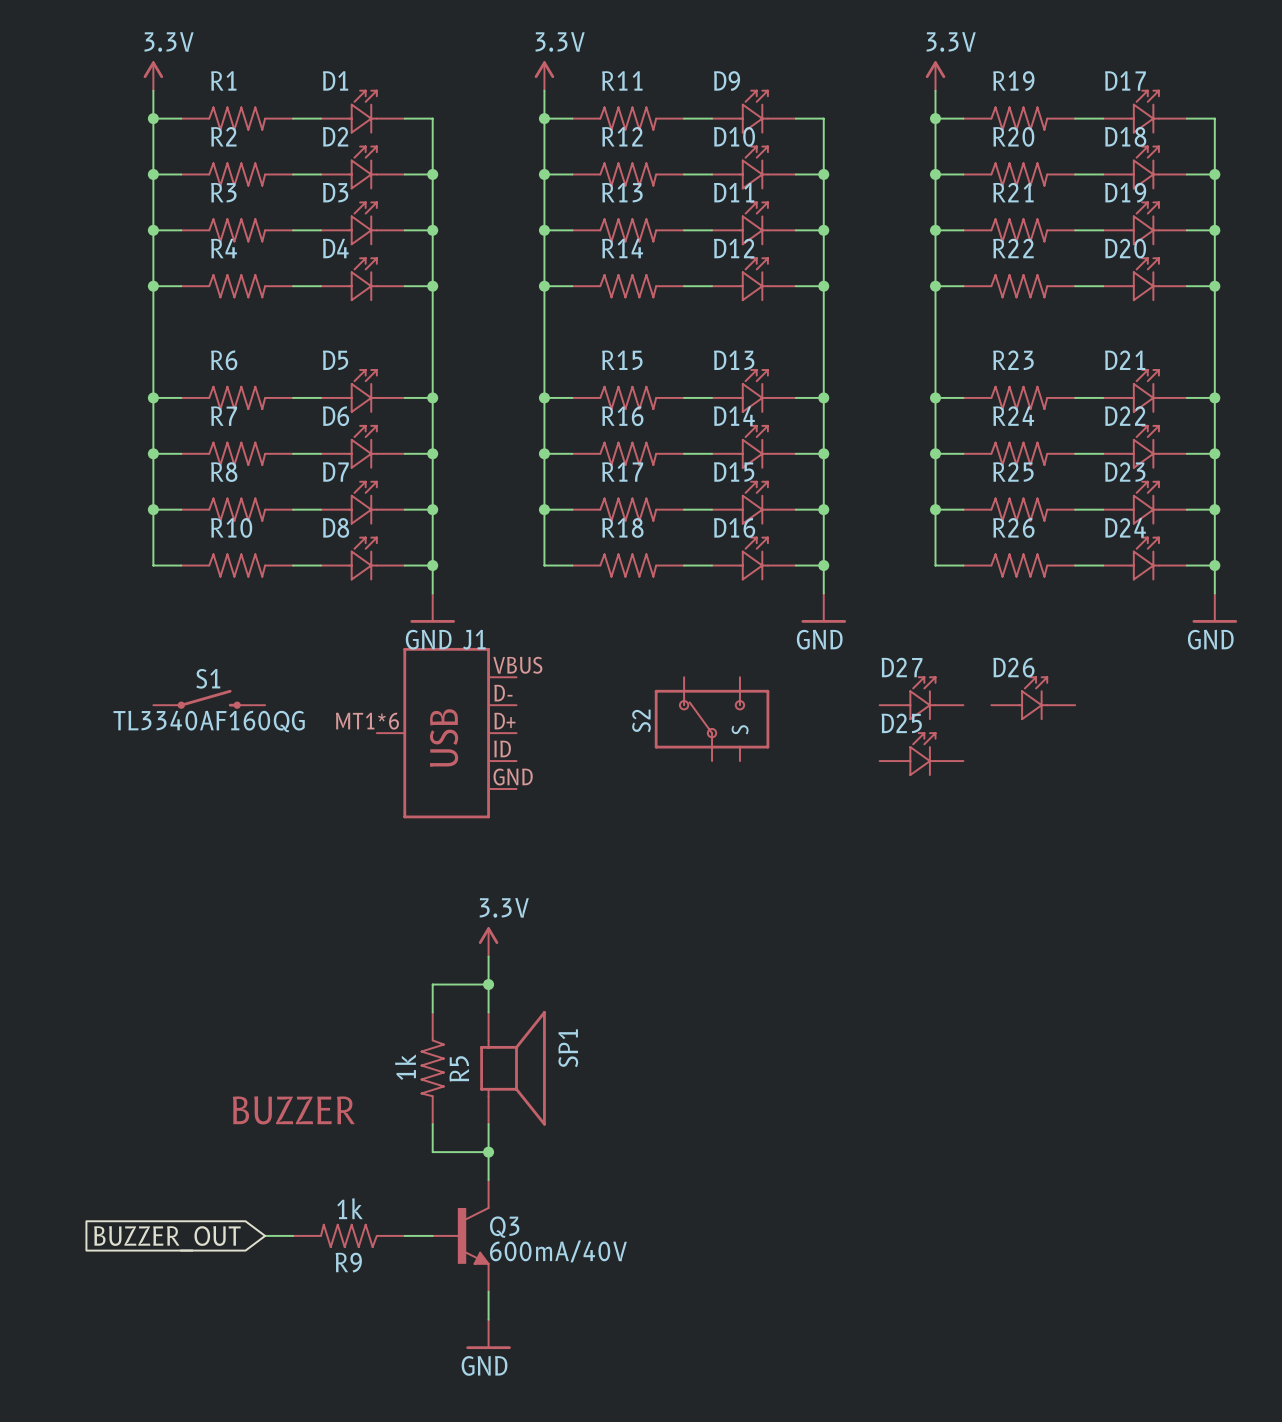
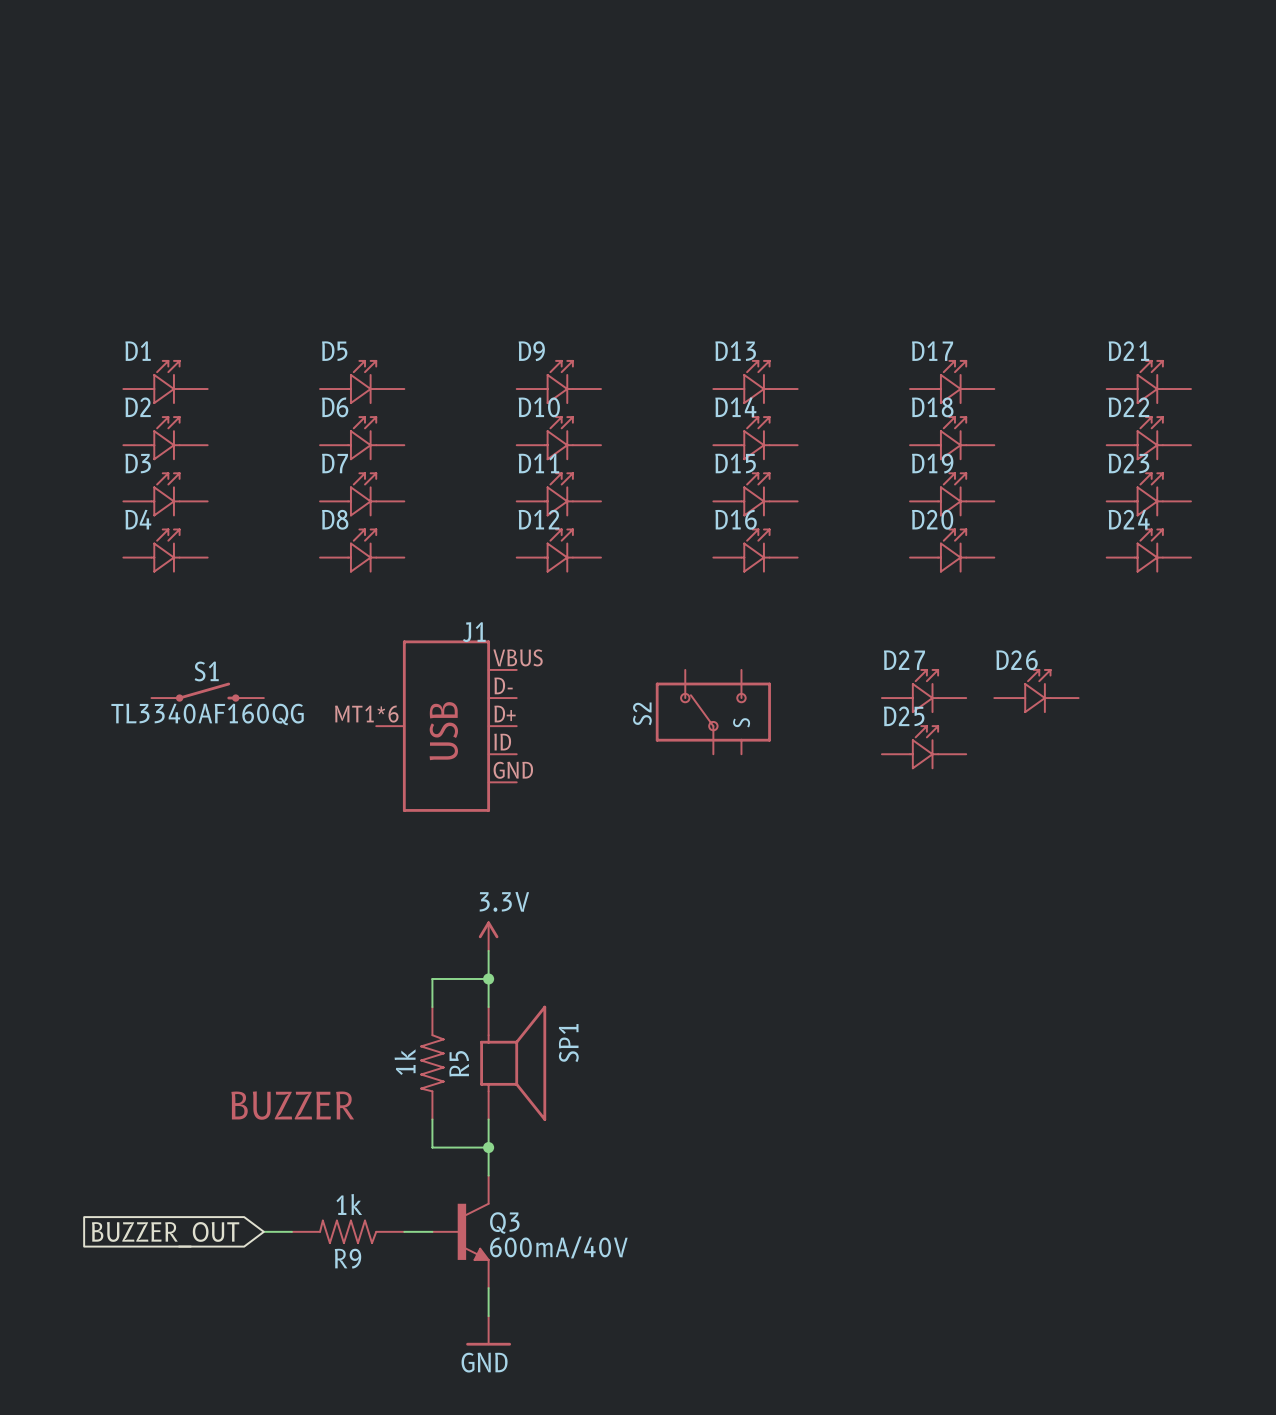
power symbol: 3.3V (153, 76) -> none
power symbol: 3.3V (544, 76) -> none
power symbol: 3.3V (935, 76) -> none
wire: (153, 90) (153, 565) (181, 565) -> none
wire: (544, 90) (544, 565) (572, 565) -> none
wire: (935, 90) (935, 565) (963, 565) -> none
D1 position: (362, 111) -> (165, 381)
D9 position: (753, 111) -> (558, 381)
D17 position: (1144, 111) -> (952, 381)
wire: (153, 118) (181, 118) -> none
junction: (153, 118) -> none
R1: (237, 118) -> none
wire: (293, 118) (320, 118) -> none
wire: (404, 118) (432, 118) (432, 593) -> none
wire: (544, 118) (572, 118) -> none
junction: (544, 118) -> none
R11: (628, 118) -> none
wire: (684, 118) (712, 118) -> none
wire: (795, 118) (823, 118) (823, 593) -> none
wire: (935, 118) (963, 118) -> none
junction: (935, 118) -> none
R19: (1019, 118) -> none
wire: (1075, 118) (1103, 118) -> none
wire: (1186, 118) (1214, 118) (1214, 593) -> none
D2 position: (362, 167) -> (165, 438)
D10 position: (753, 167) -> (558, 438)
D18 position: (1144, 167) -> (952, 438)
wire: (153, 174) (181, 174) -> none
junction: (153, 174) -> none
R2: (237, 174) -> none
wire: (293, 174) (320, 174) -> none
wire: (404, 174) (432, 174) -> none
junction: (432, 174) -> none
wire: (544, 174) (572, 174) -> none
junction: (544, 174) -> none
R12: (628, 174) -> none
wire: (684, 174) (712, 174) -> none
wire: (795, 174) (823, 174) -> none
junction: (823, 174) -> none
wire: (935, 174) (963, 174) -> none
junction: (935, 174) -> none
R20: (1019, 174) -> none
wire: (1075, 174) (1103, 174) -> none
wire: (1186, 174) (1214, 174) -> none
junction: (1214, 174) -> none
D3 position: (362, 223) -> (165, 494)
D11 position: (753, 223) -> (558, 494)
D19 position: (1144, 223) -> (952, 494)
wire: (153, 230) (181, 230) -> none
junction: (153, 230) -> none
R3: (237, 230) -> none
wire: (293, 230) (320, 230) -> none
wire: (404, 230) (432, 230) -> none
junction: (432, 230) -> none
wire: (544, 230) (572, 230) -> none
junction: (544, 230) -> none
R13: (628, 230) -> none
wire: (684, 230) (712, 230) -> none
wire: (795, 230) (823, 230) -> none
junction: (823, 230) -> none
wire: (935, 230) (963, 230) -> none
junction: (935, 230) -> none
R21: (1019, 230) -> none
wire: (1075, 230) (1103, 230) -> none
wire: (1186, 230) (1214, 230) -> none
junction: (1214, 230) -> none
D4 position: (362, 279) -> (165, 550)
D12 position: (753, 279) -> (558, 550)
D20 position: (1144, 279) -> (952, 550)
wire: (153, 286) (181, 286) -> none
junction: (153, 286) -> none
R4: (237, 286) -> none
wire: (293, 286) (320, 286) -> none
wire: (404, 286) (432, 286) -> none
junction: (432, 286) -> none
wire: (544, 286) (572, 286) -> none
junction: (544, 286) -> none
R14: (628, 286) -> none
wire: (684, 286) (712, 286) -> none
wire: (795, 286) (823, 286) -> none
junction: (823, 286) -> none
wire: (935, 286) (963, 286) -> none
junction: (935, 286) -> none
R22: (1019, 286) -> none
wire: (1075, 286) (1103, 286) -> none
wire: (1186, 286) (1214, 286) -> none
junction: (1214, 286) -> none
wire: (153, 397) (181, 397) -> none
junction: (153, 397) -> none
R6: (237, 397) -> none
wire: (293, 397) (320, 397) -> none
wire: (404, 397) (432, 397) -> none
junction: (432, 397) -> none
wire: (544, 397) (572, 397) -> none
junction: (544, 397) -> none
R15: (628, 397) -> none
wire: (684, 397) (712, 397) -> none
wire: (795, 397) (823, 397) -> none
junction: (823, 397) -> none
wire: (935, 397) (963, 397) -> none
junction: (935, 397) -> none
R23: (1019, 397) -> none
wire: (1075, 397) (1103, 397) -> none
wire: (1186, 397) (1214, 397) -> none
junction: (1214, 397) -> none
wire: (153, 453) (181, 453) -> none
junction: (153, 453) -> none
R7: (237, 453) -> none
wire: (293, 453) (320, 453) -> none
wire: (404, 453) (432, 453) -> none
junction: (432, 453) -> none
wire: (544, 453) (572, 453) -> none
junction: (544, 453) -> none
R16: (628, 453) -> none
wire: (684, 453) (712, 453) -> none
wire: (795, 453) (823, 453) -> none
junction: (823, 453) -> none
wire: (935, 453) (963, 453) -> none
junction: (935, 453) -> none
R24: (1019, 453) -> none
wire: (1075, 453) (1103, 453) -> none
wire: (1186, 453) (1214, 453) -> none
junction: (1214, 453) -> none
wire: (153, 509) (181, 509) -> none
junction: (153, 509) -> none
R8: (237, 509) -> none
wire: (293, 509) (320, 509) -> none
wire: (404, 509) (432, 509) -> none
junction: (432, 509) -> none
wire: (544, 509) (572, 509) -> none
junction: (544, 509) -> none
R17: (628, 509) -> none
wire: (684, 509) (712, 509) -> none
wire: (795, 509) (823, 509) -> none
junction: (823, 509) -> none
wire: (935, 509) (963, 509) -> none
junction: (935, 509) -> none
R25: (1019, 509) -> none
wire: (1075, 509) (1103, 509) -> none
wire: (1186, 509) (1214, 509) -> none
junction: (1214, 509) -> none
R10: (237, 565) -> none
wire: (293, 565) (320, 565) -> none
wire: (404, 565) (432, 565) -> none
junction: (432, 565) -> none
R18: (628, 565) -> none
wire: (684, 565) (712, 565) -> none
wire: (795, 565) (823, 565) -> none
junction: (823, 565) -> none
R26: (1019, 565) -> none
wire: (1075, 565) (1103, 565) -> none
wire: (1186, 565) (1214, 565) -> none
junction: (1214, 565) -> none
power symbol: GND (432, 608) -> none
power symbol: GND (823, 608) -> none
power symbol: GND (1214, 608) -> none

